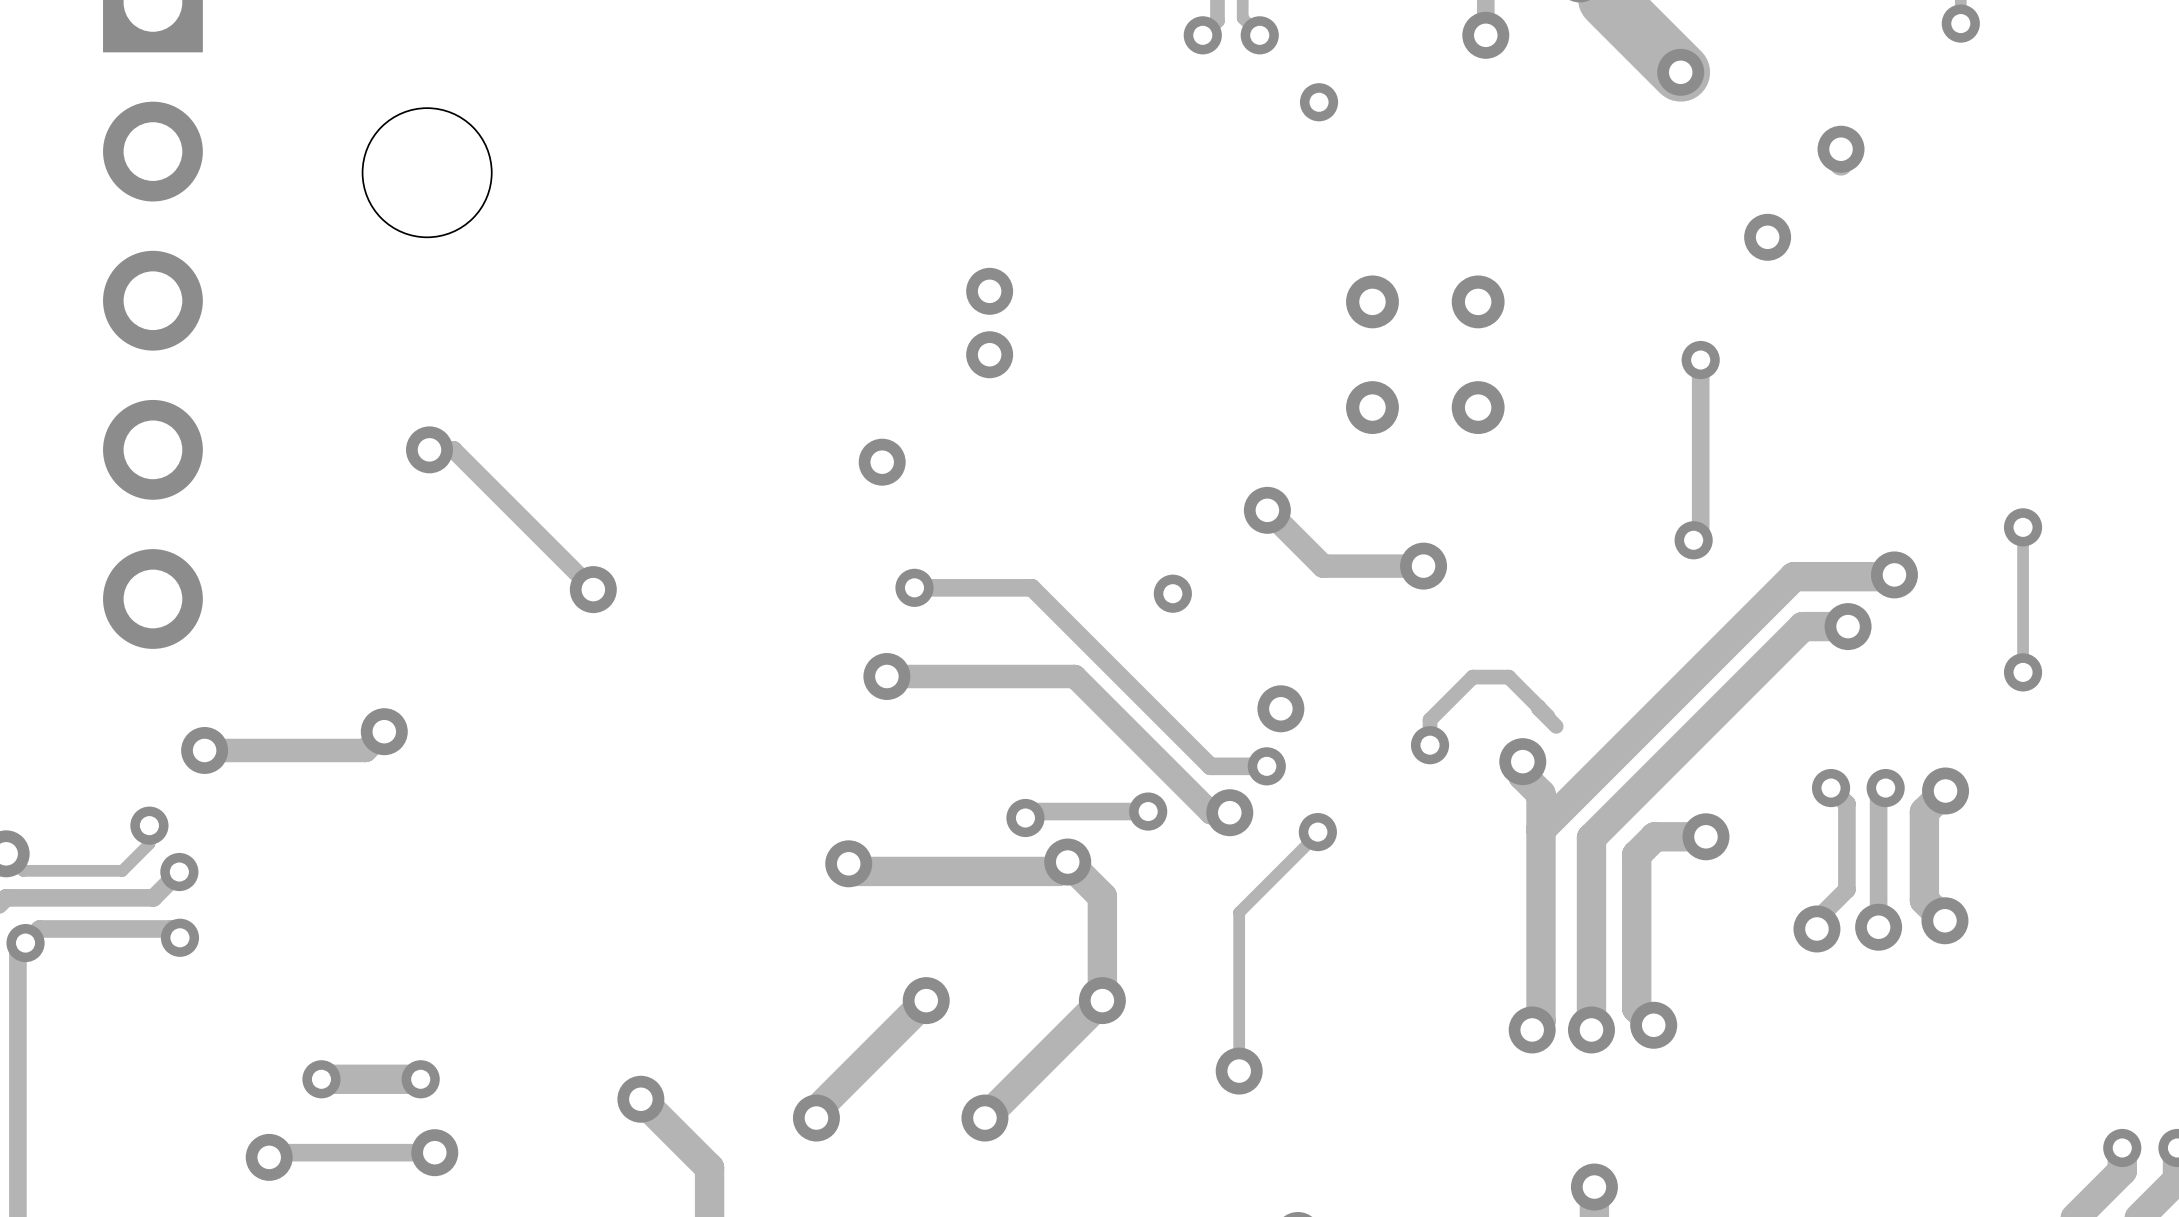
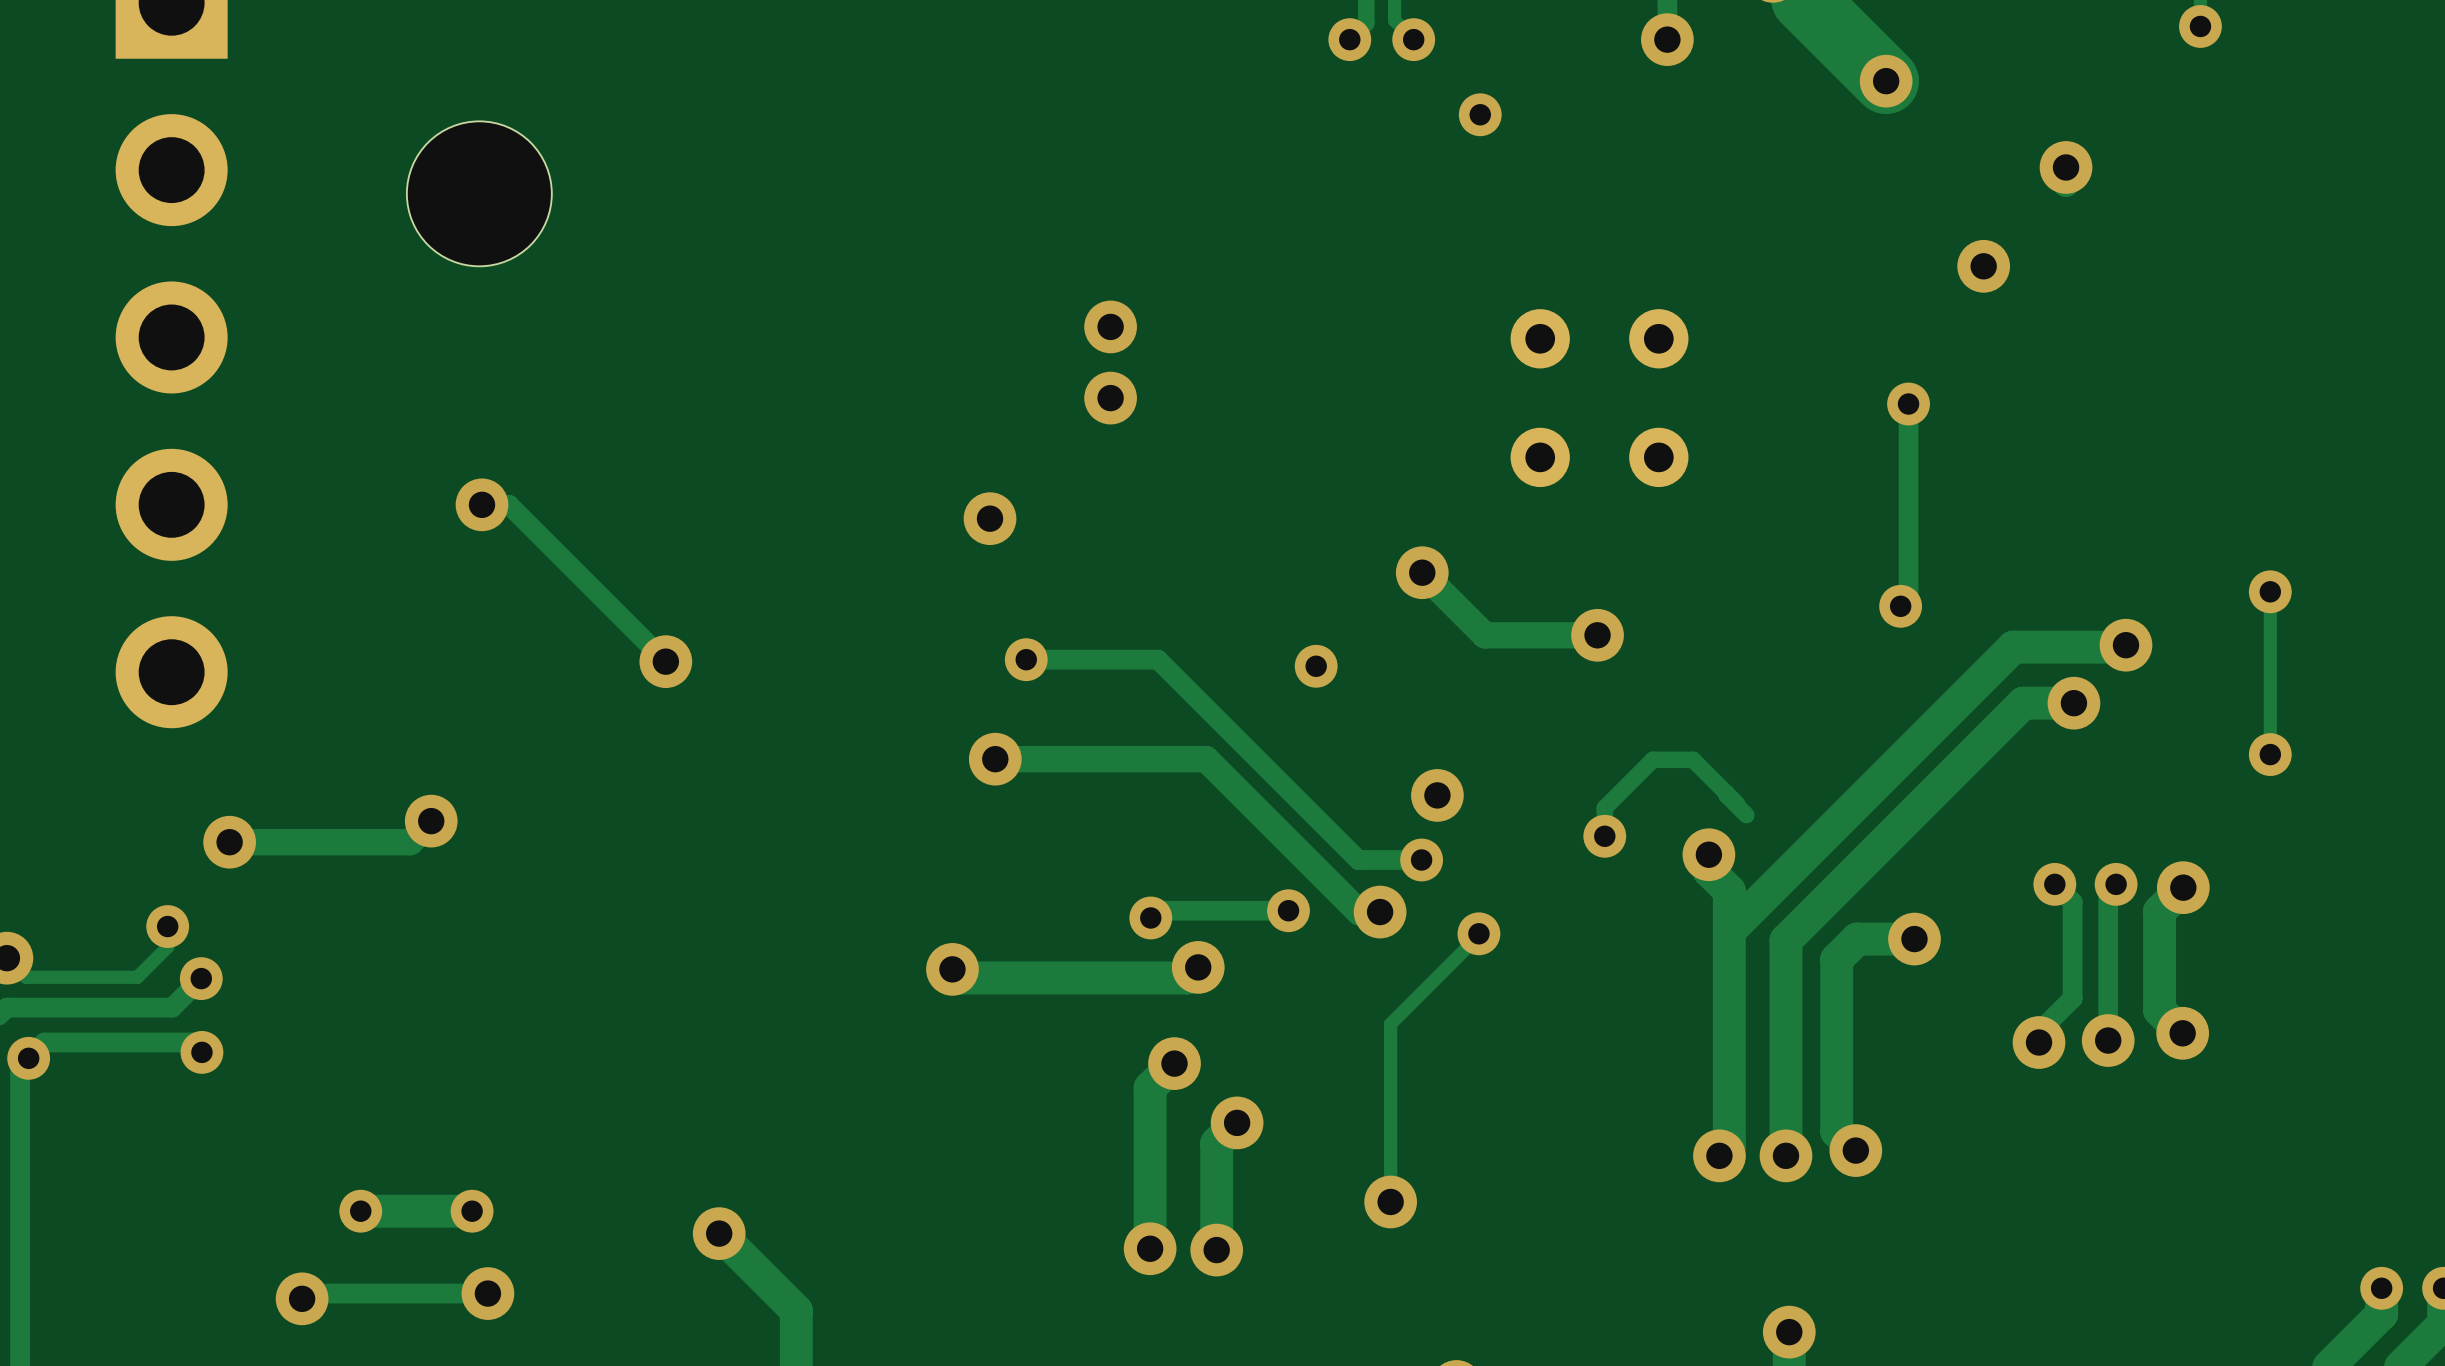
track: (1067, 862) (1102, 896) (1102, 1000) -> none
track: none -> (1174, 1063) (1150, 1087) (1150, 1248)
via: none -> (1174, 1063)
track: (926, 1000) (816, 1110) (816, 1118) -> none
via: (926, 1000) -> none
track: (1084, 1018) (984, 1118) -> (1216, 1143) (1216, 1250)
via: none -> (1216, 1250)
via: (816, 1118) -> none
via position: (984, 1118) -> (1150, 1248)

